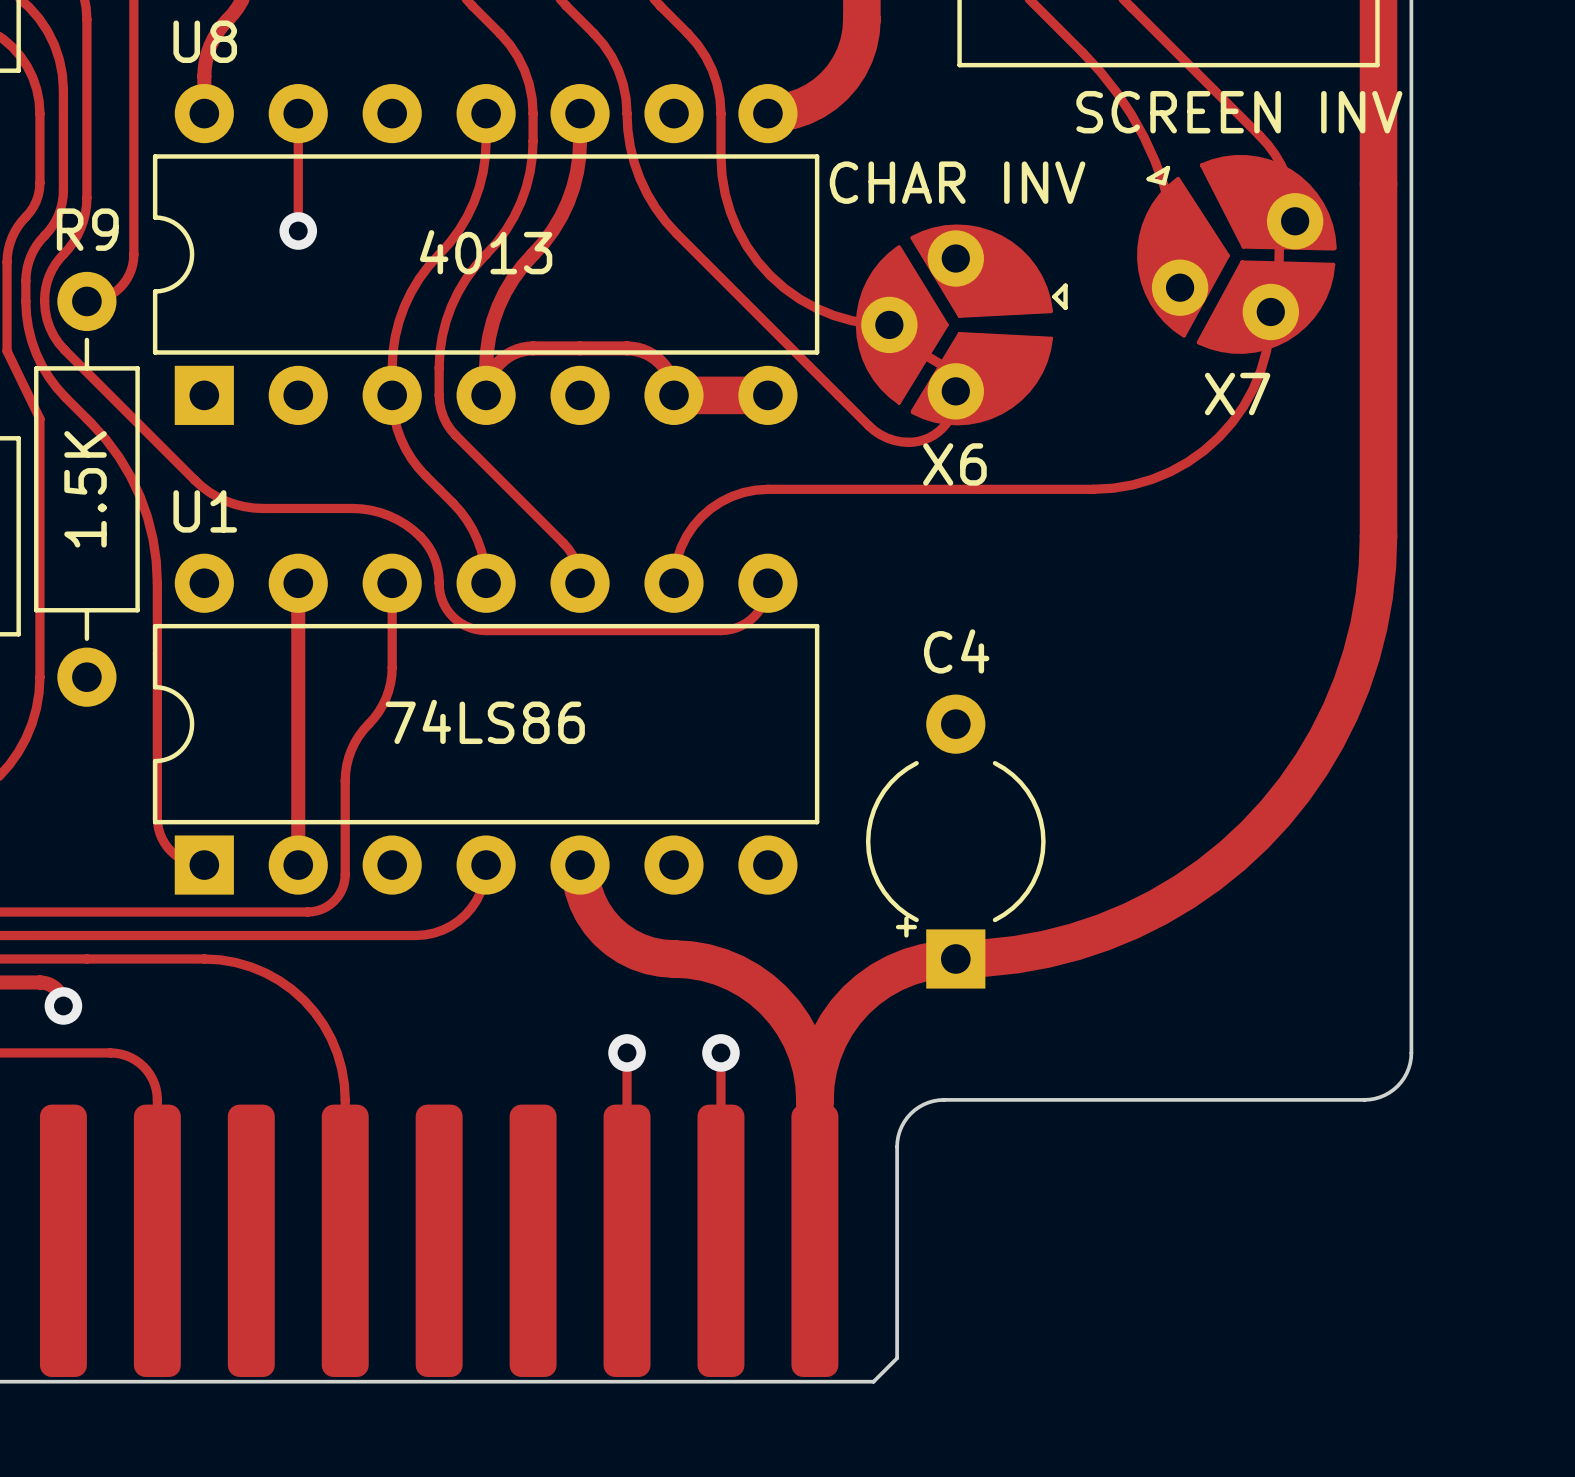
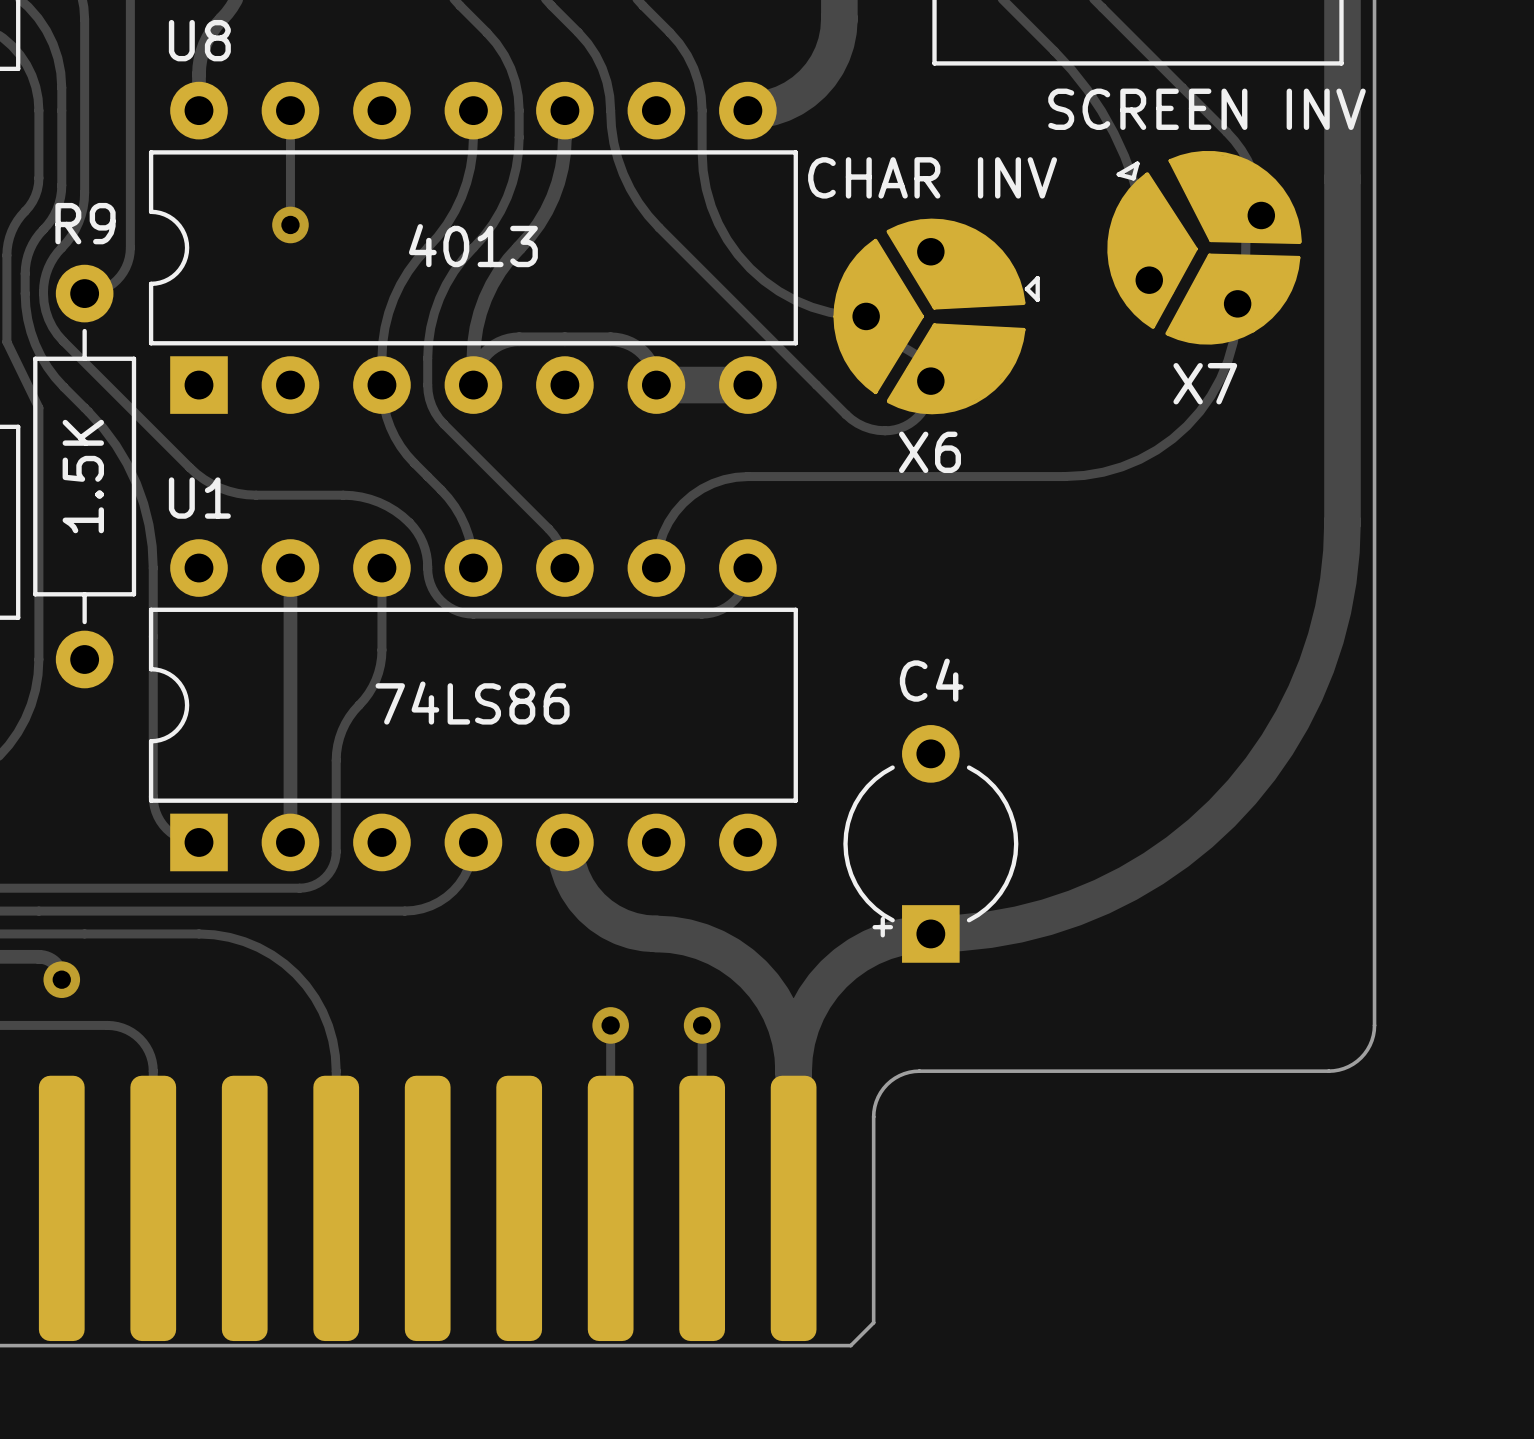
C4 footprint: [865, 694, 1046, 989] -> [843, 725, 1019, 963]

